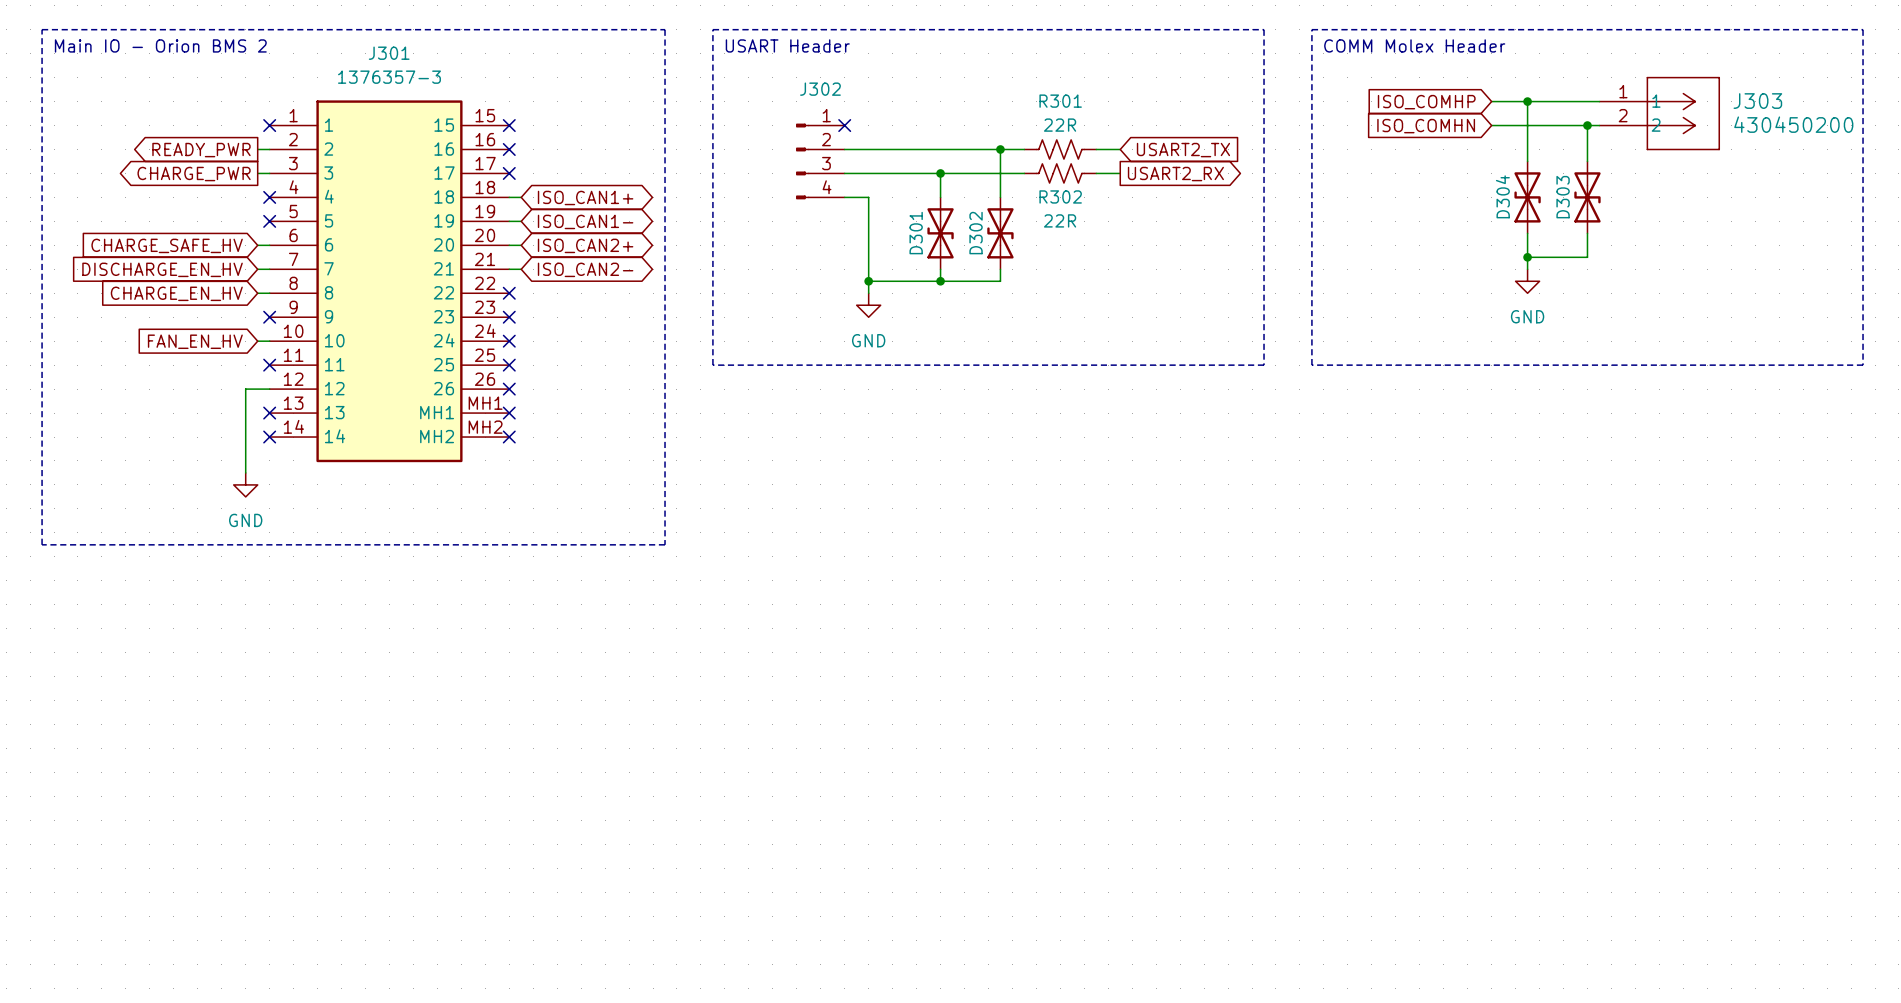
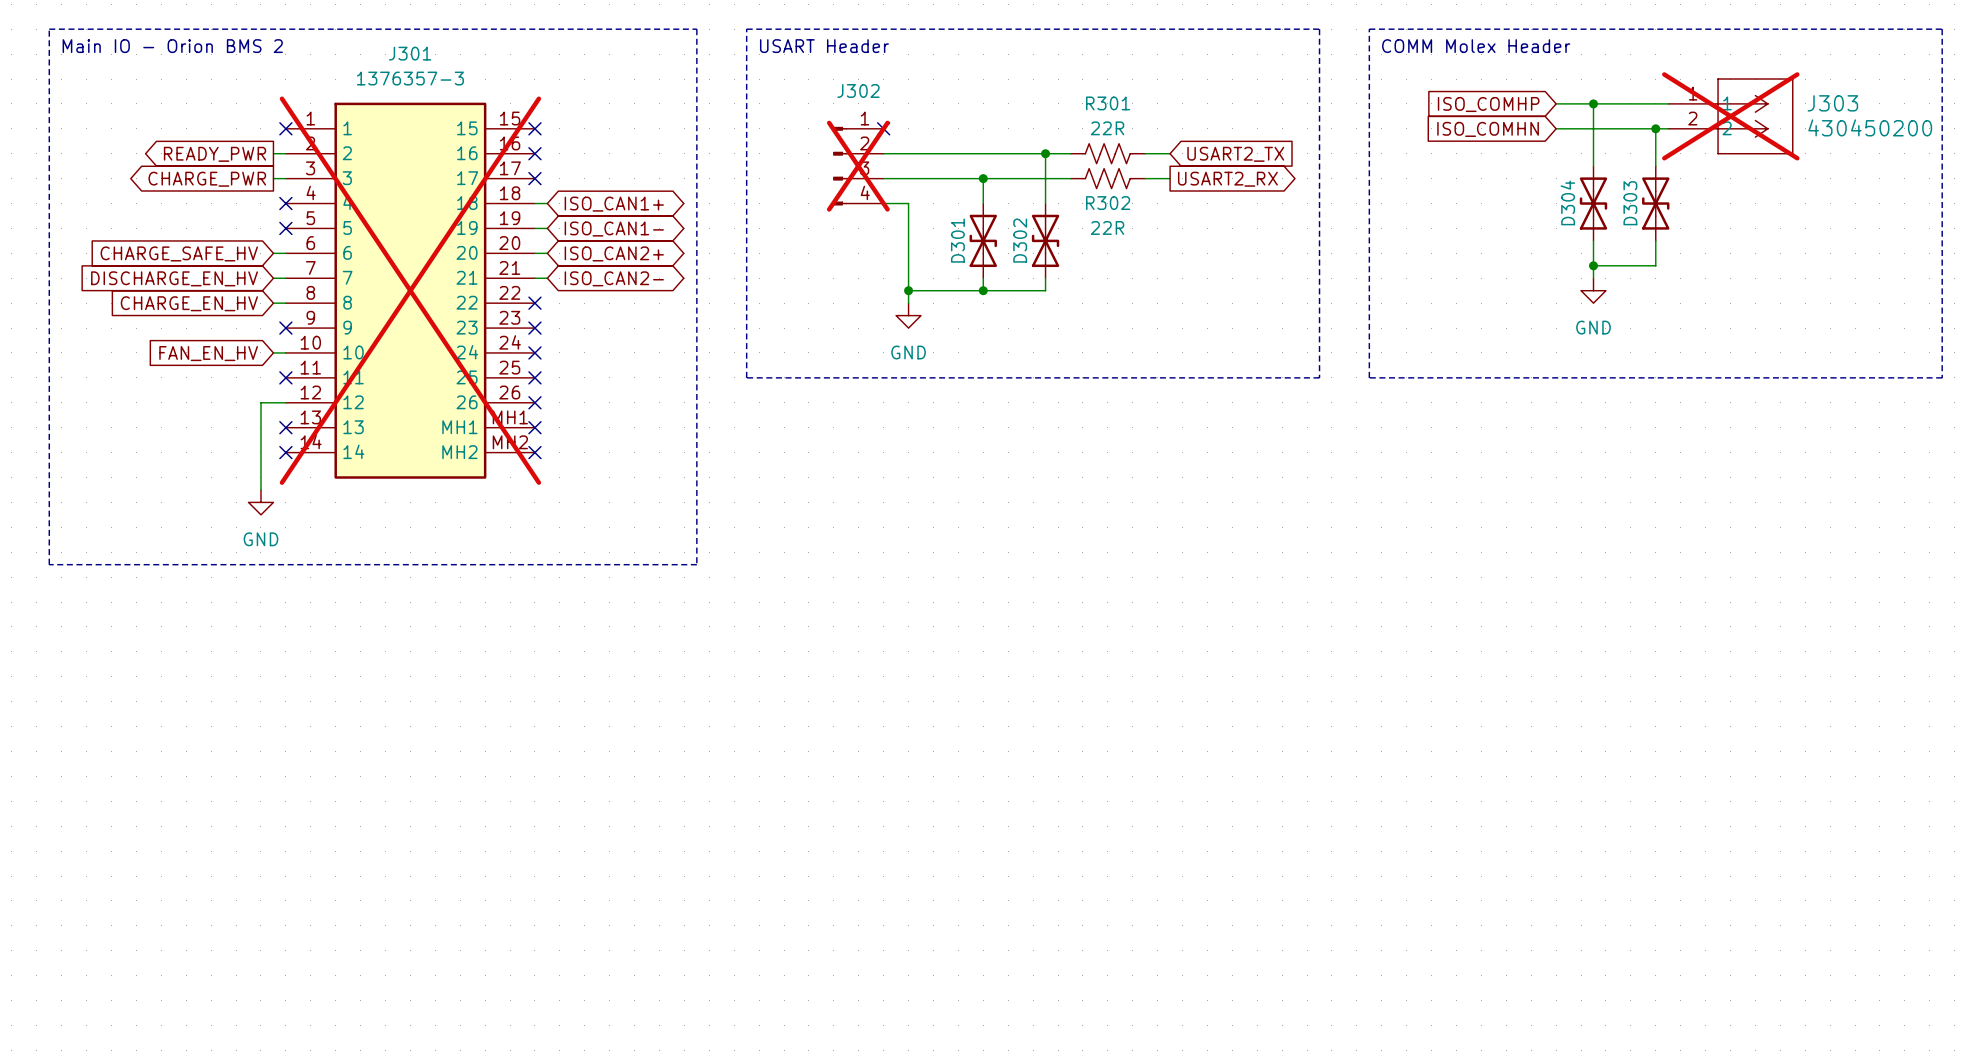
J303 do-not-place cross: none -> (1730, 116)
J302 do-not-place cross: none -> (858, 166)
J301 do-not-place cross: none -> (410, 290)

